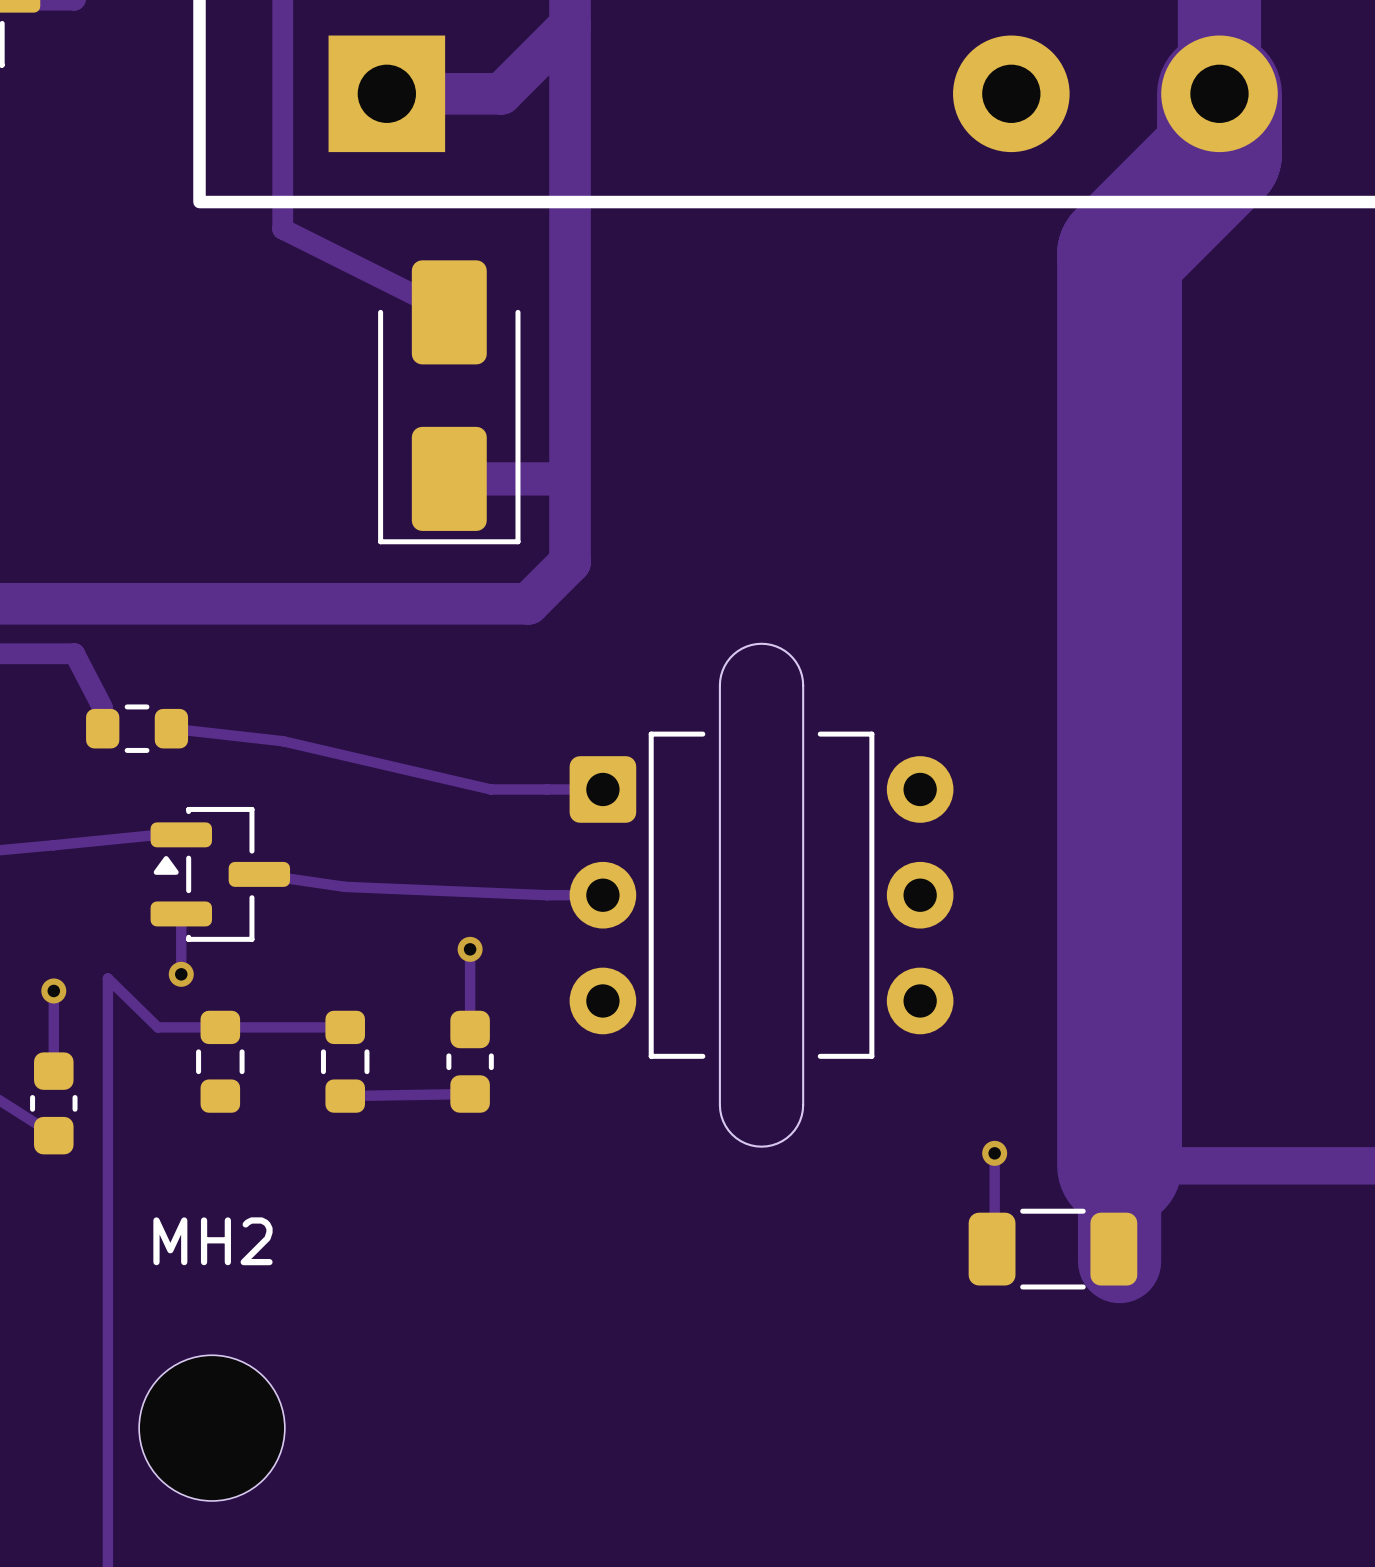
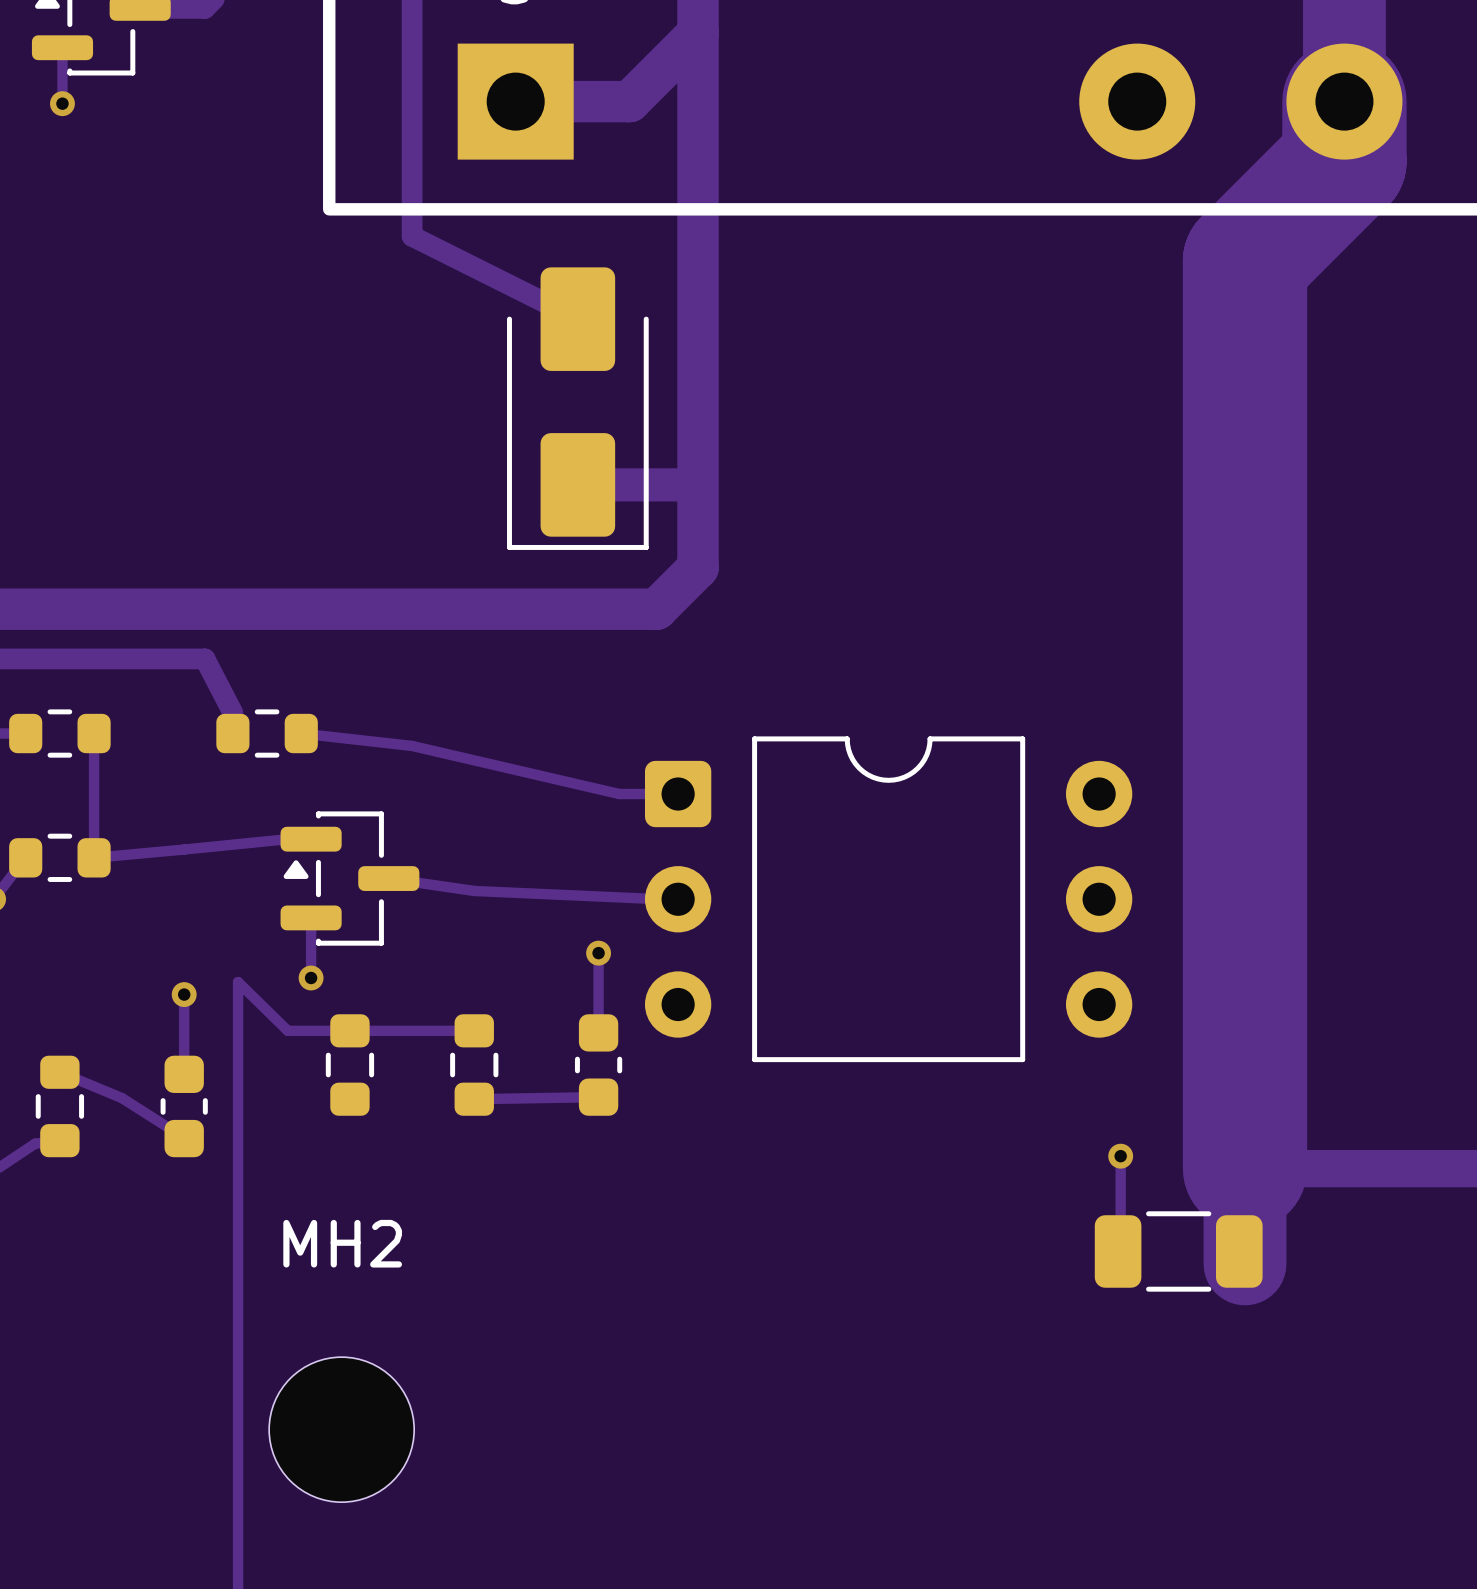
part footprint: [569, 642, 954, 1148] -> [644, 736, 1133, 1063]
track: (532, 789) (578, 789) -> none
track: (345, 886) (578, 895) -> (474, 890) (660, 899)

